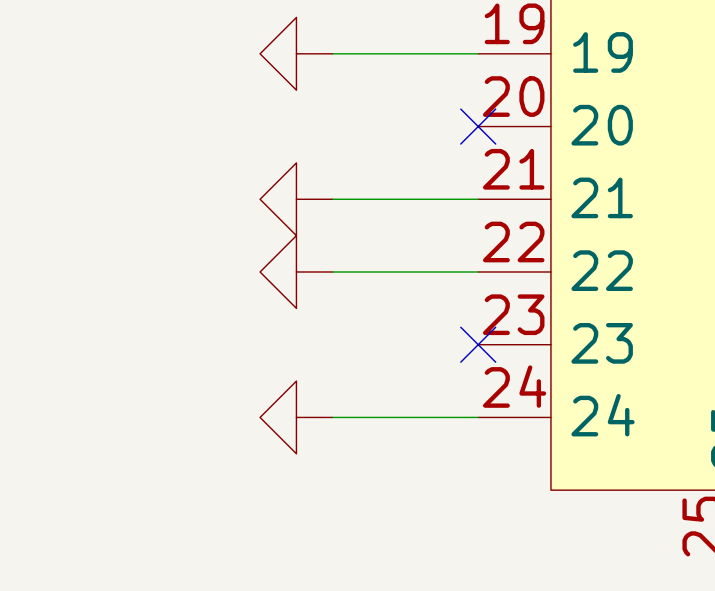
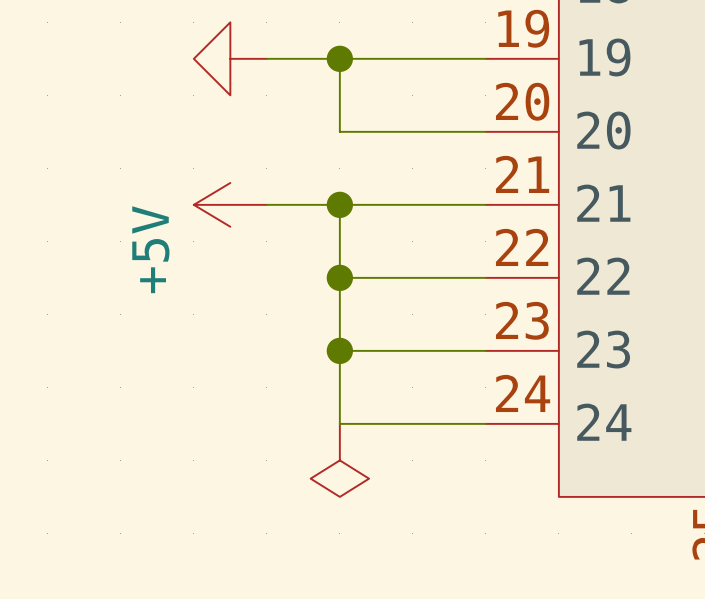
wire: none -> (266, 58) (339, 58) (339, 131) (485, 131)
power symbol position: (296, 53) -> (230, 58)
junction: none -> (339, 58)
no-connect mark: (478, 126) -> none
power symbol: none -> +5V (230, 204)
wire: none -> (266, 204) (339, 204) (339, 423)
power symbol: (296, 199) -> none
junction: none -> (339, 204)
power symbol: (296, 271) -> none
junction: none -> (339, 277)
wire: none -> (339, 350) (485, 350)
junction: none -> (339, 350)
no-connect mark: (478, 344) -> none
power symbol: (296, 417) -> none
power symbol: none -> (339, 460)

